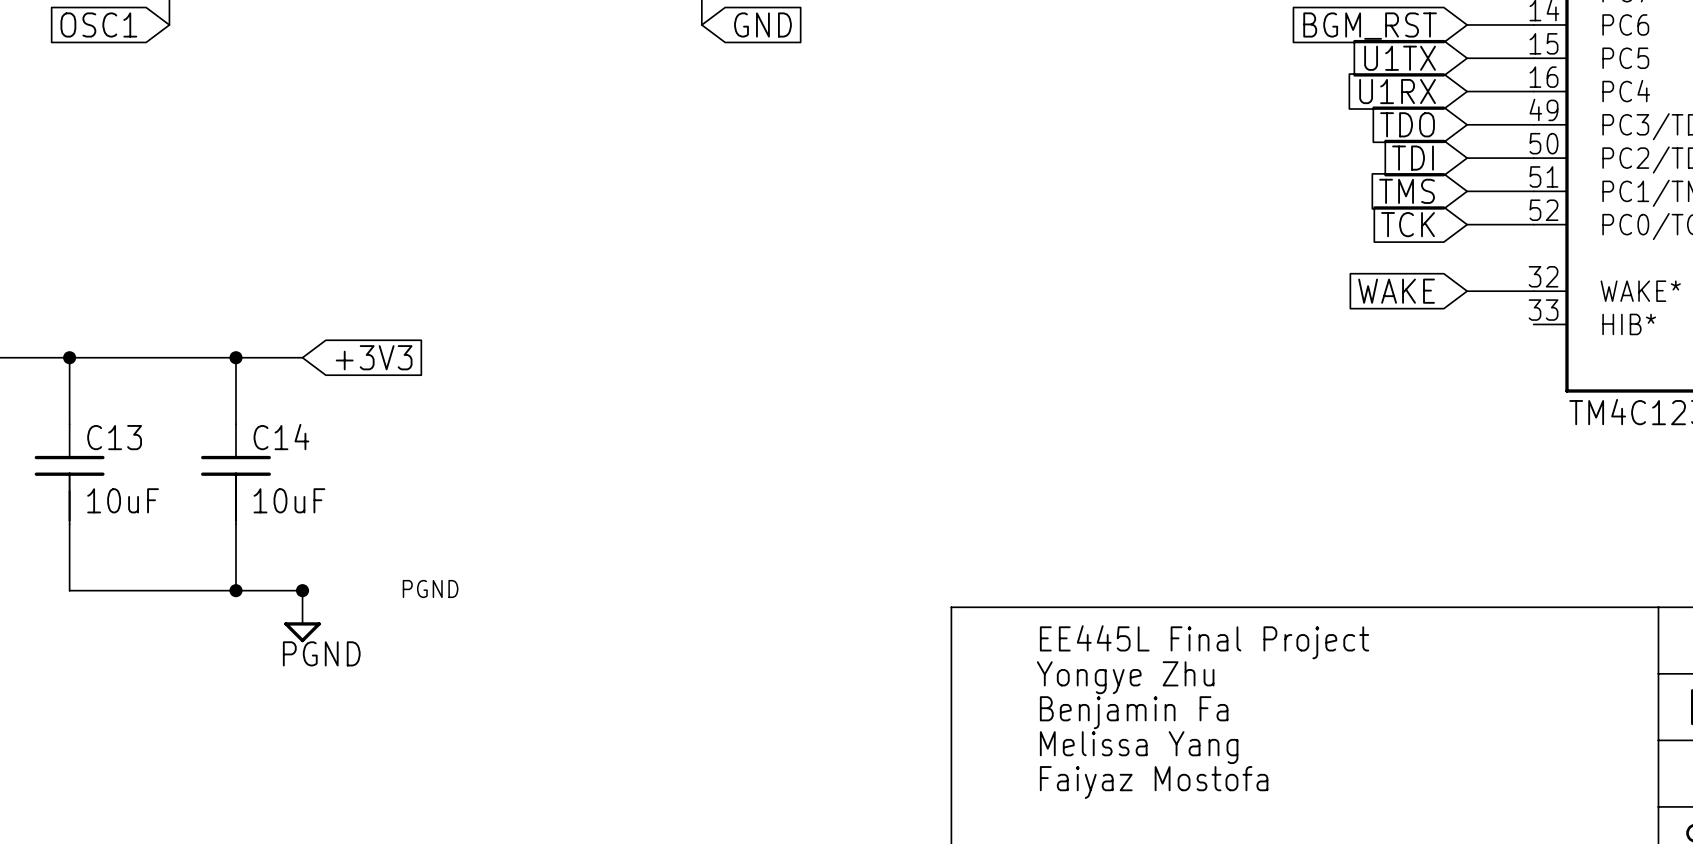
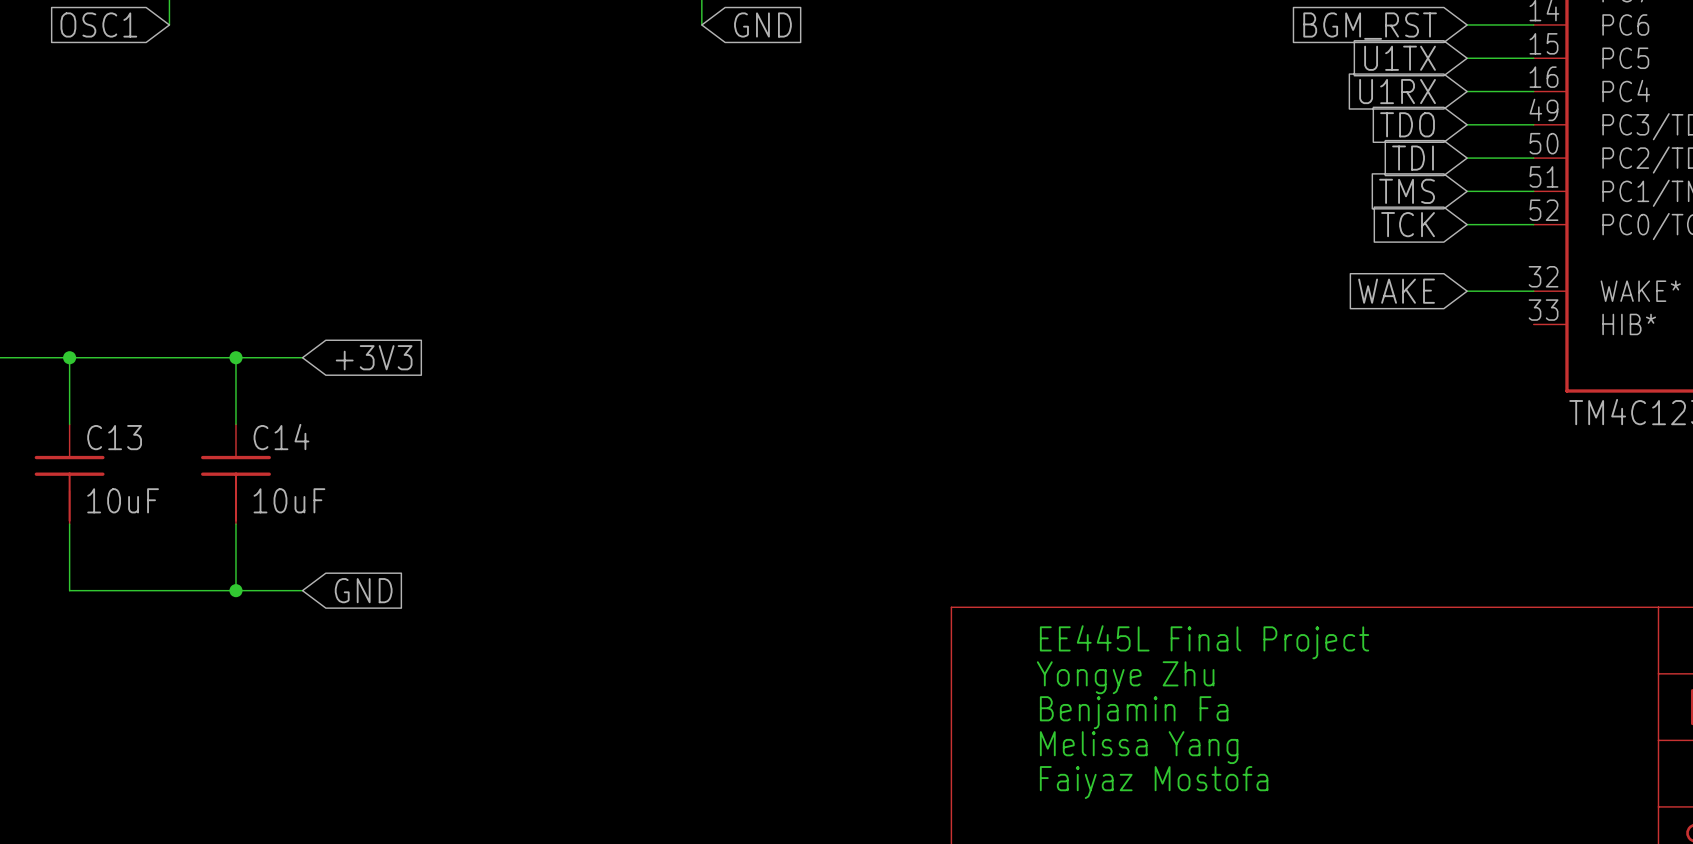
label: PGND (430, 588) -> none
junction: (302, 590) -> none
global label: none -> GND (363, 590)
power symbol: PGND (302, 616) -> none

